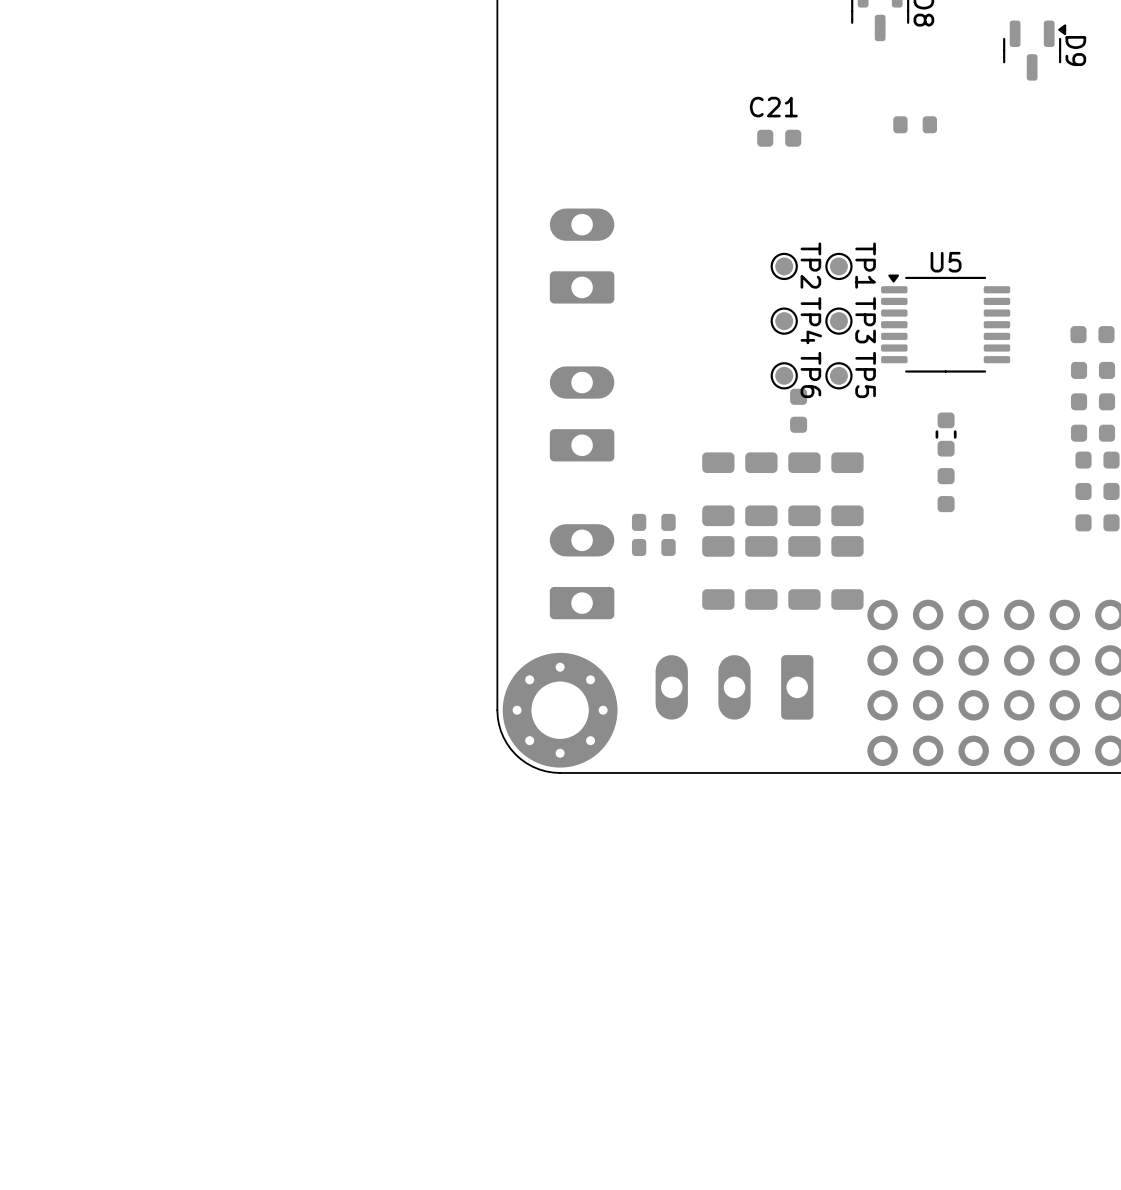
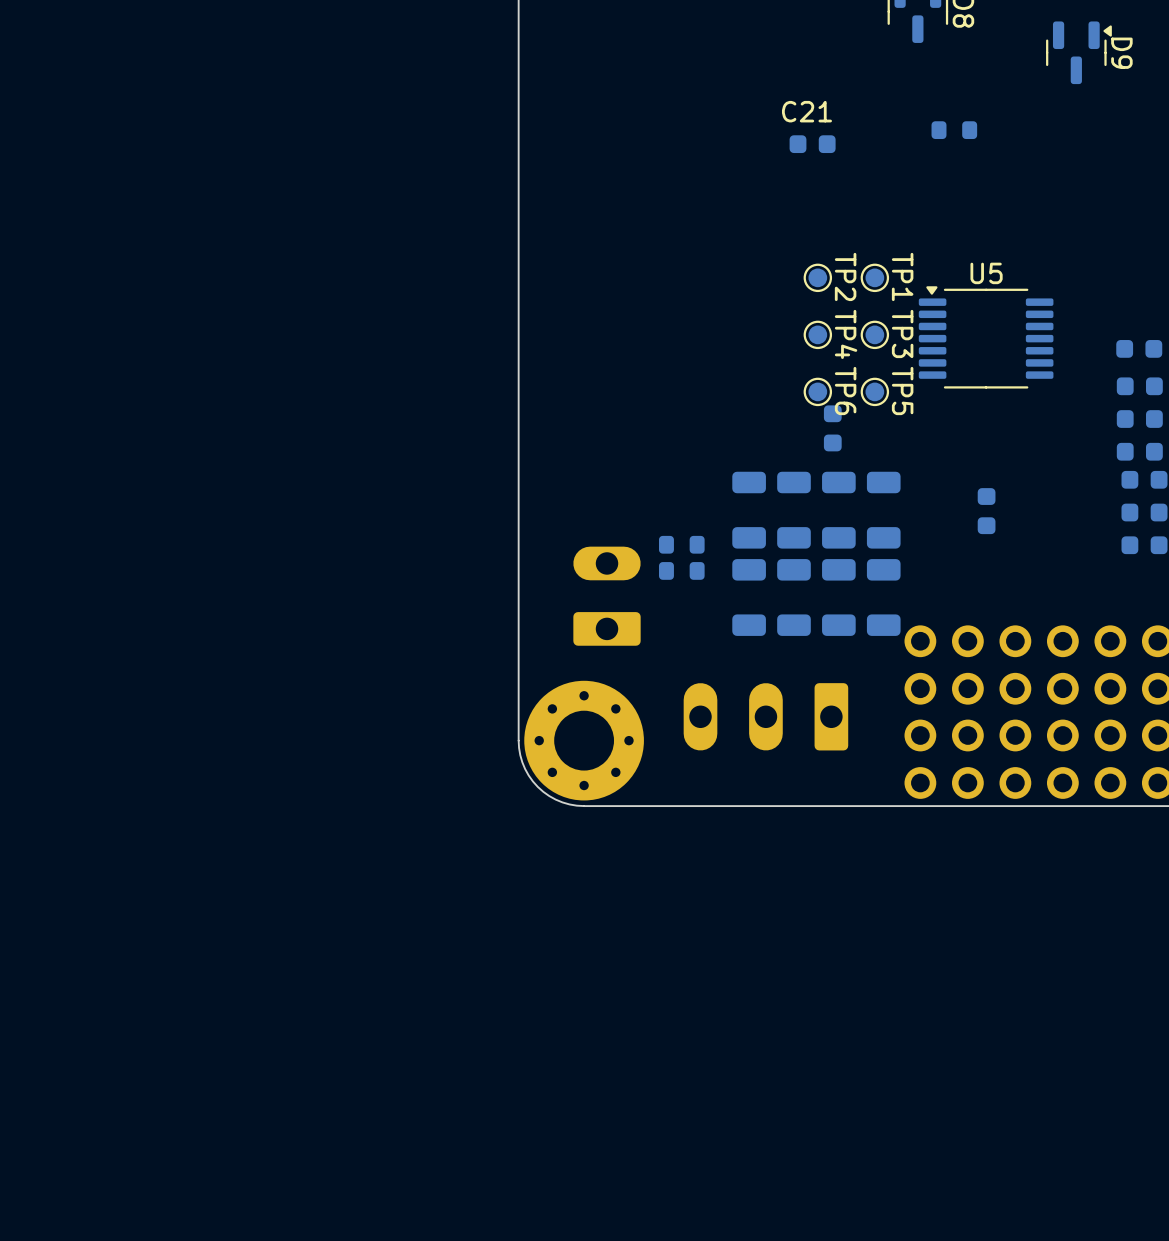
part: (582, 256) -> none
part: (582, 413) -> none
part: (946, 434) -> none

